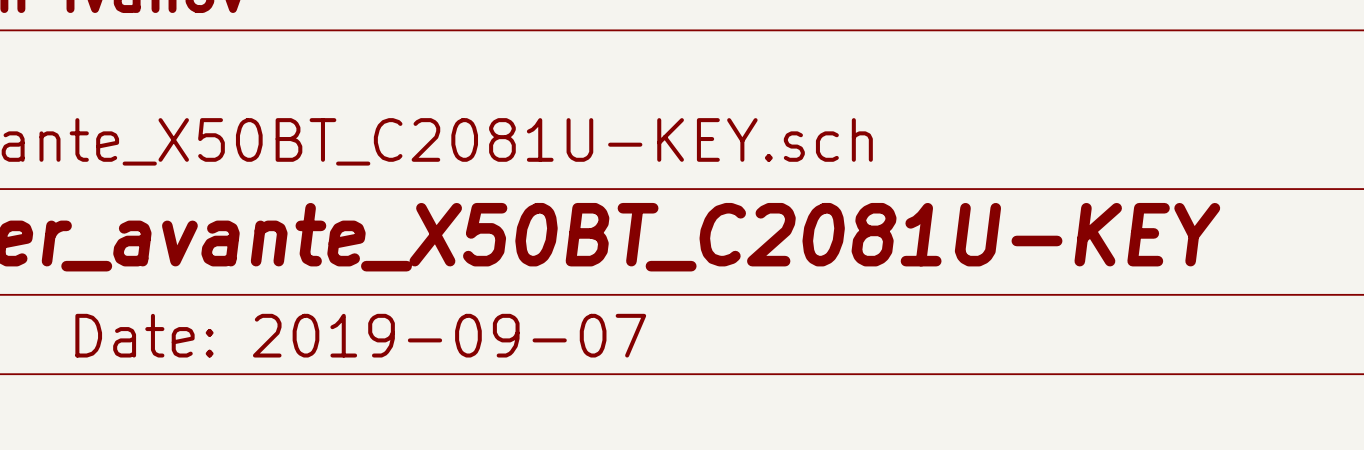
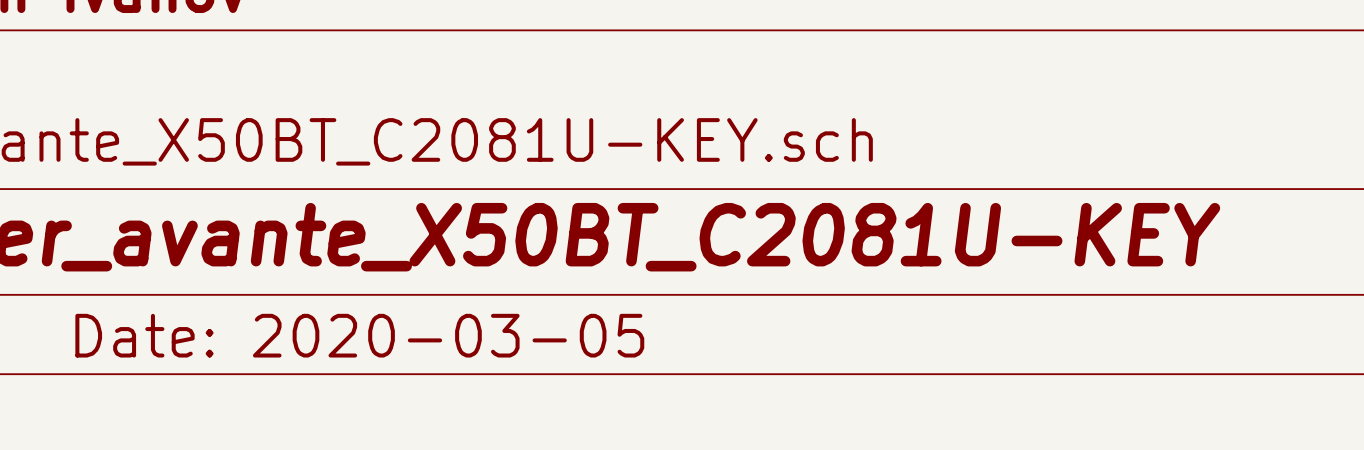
title block: Date: 2019-09-07 (360, 335) -> Date: 2020-03-05 (359, 335)

